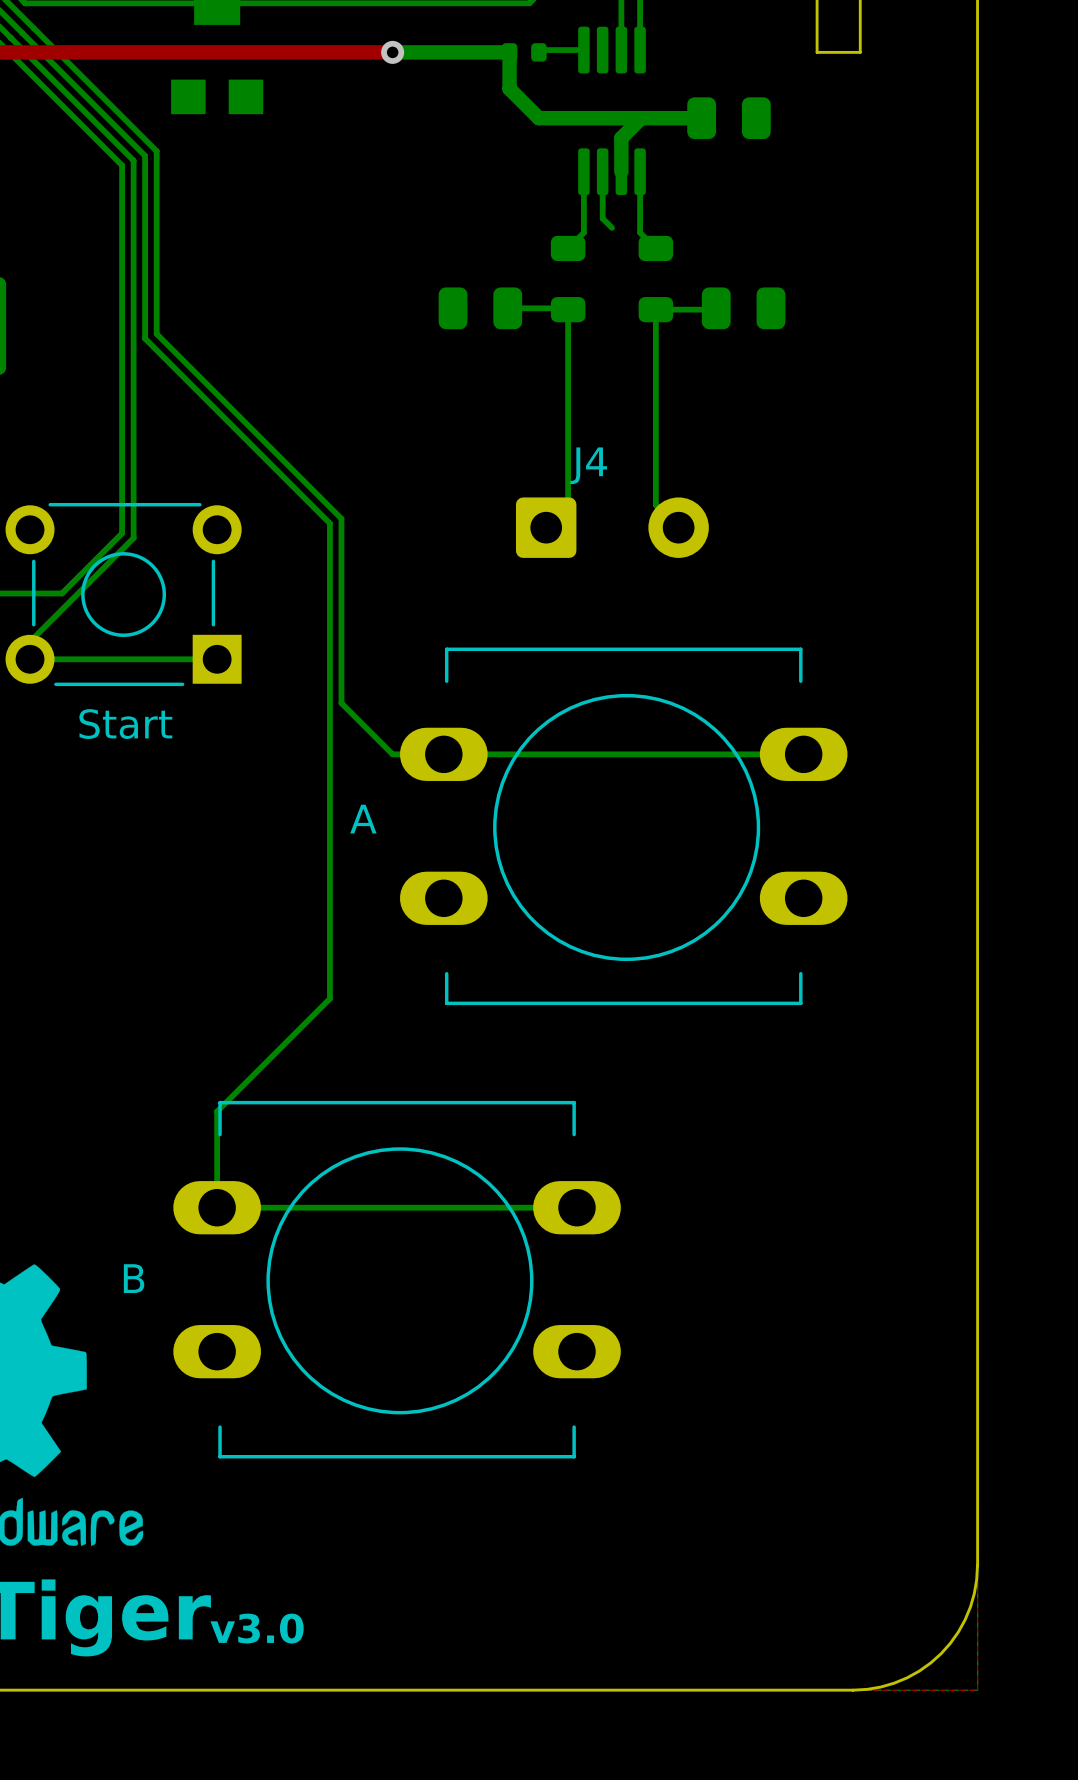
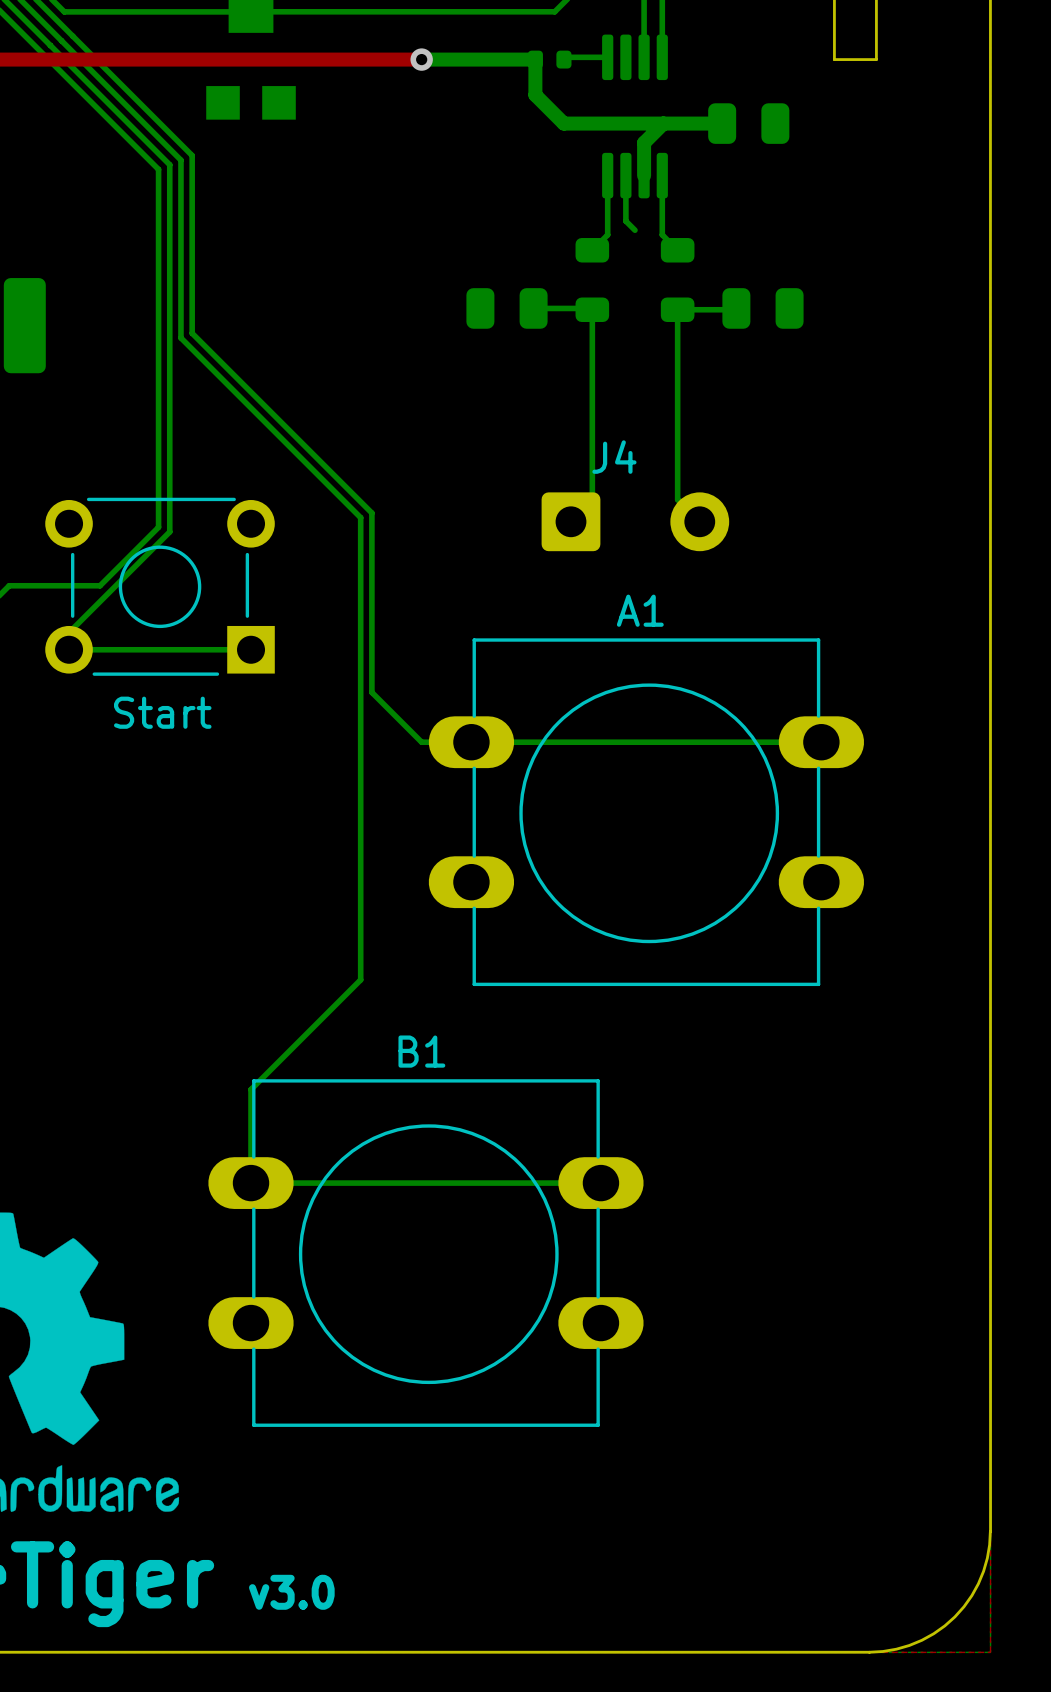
part: A (623, 826) -> none
A1: none -> (646, 812)
part: B (397, 1279) -> none
B1: none -> (425, 1253)

